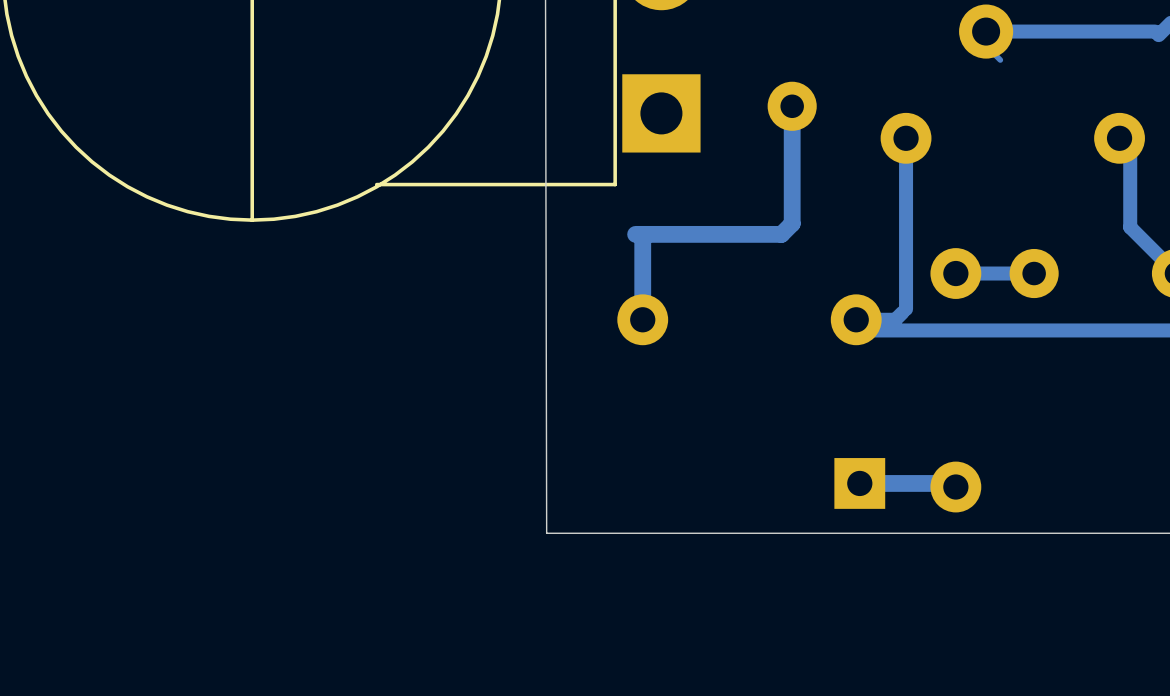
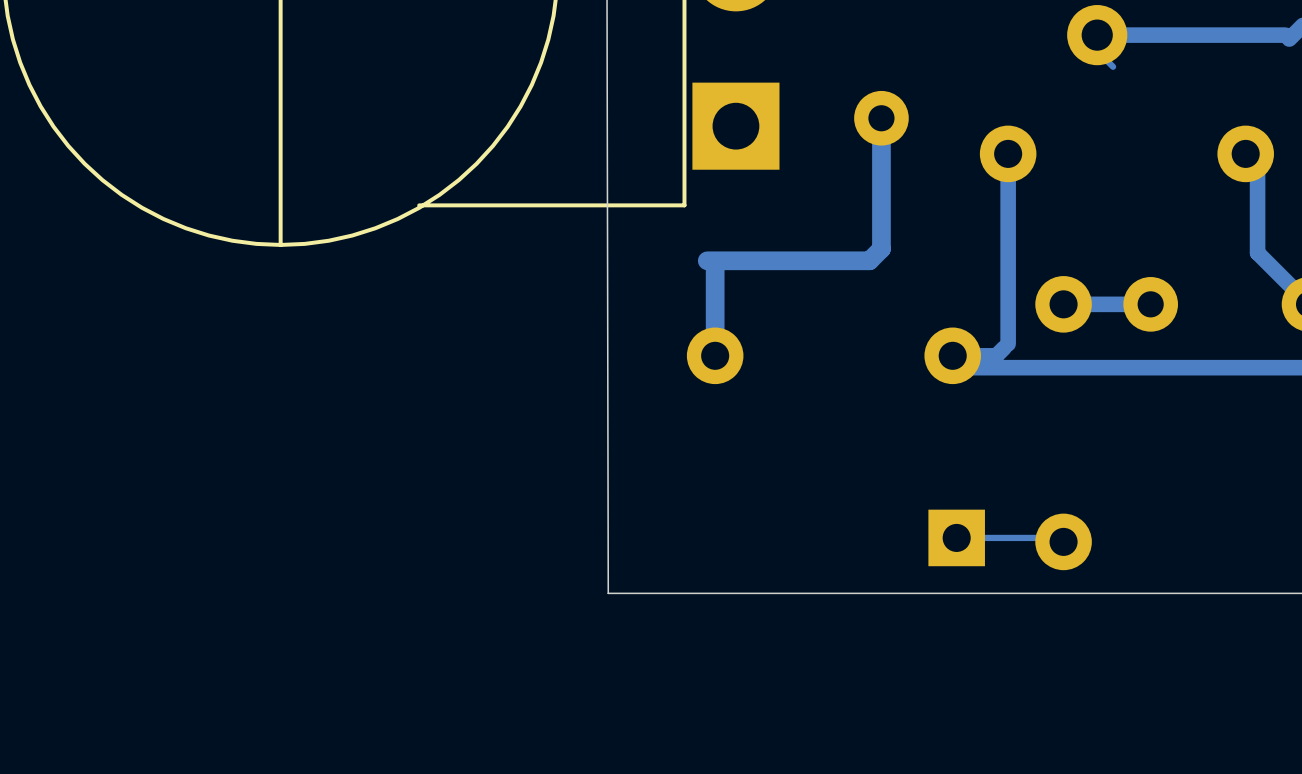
bottom track width: thick (952, 483) (859, 483) -> thin (1059, 537) (956, 537)

